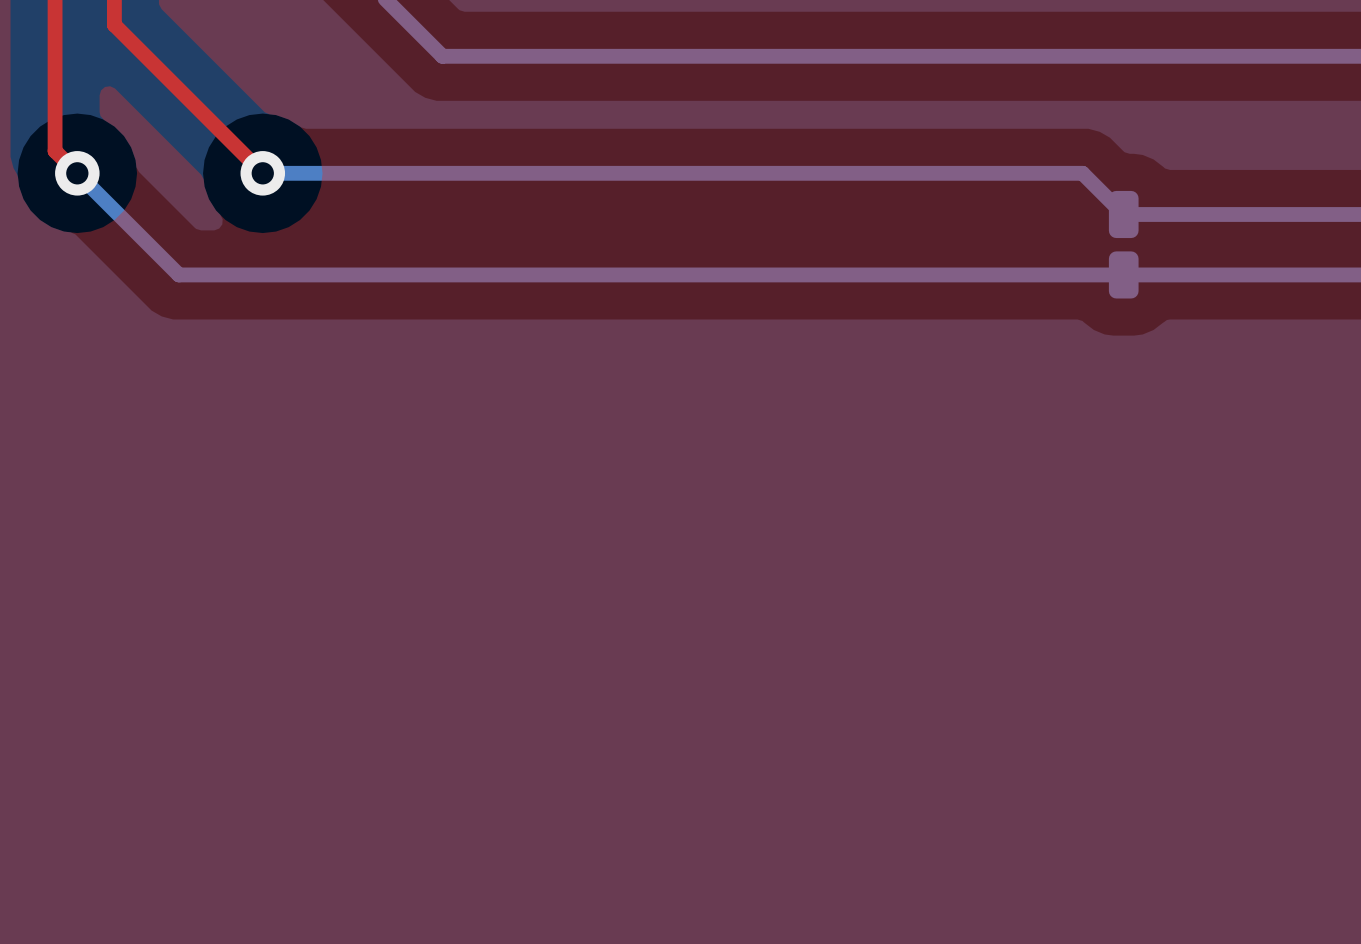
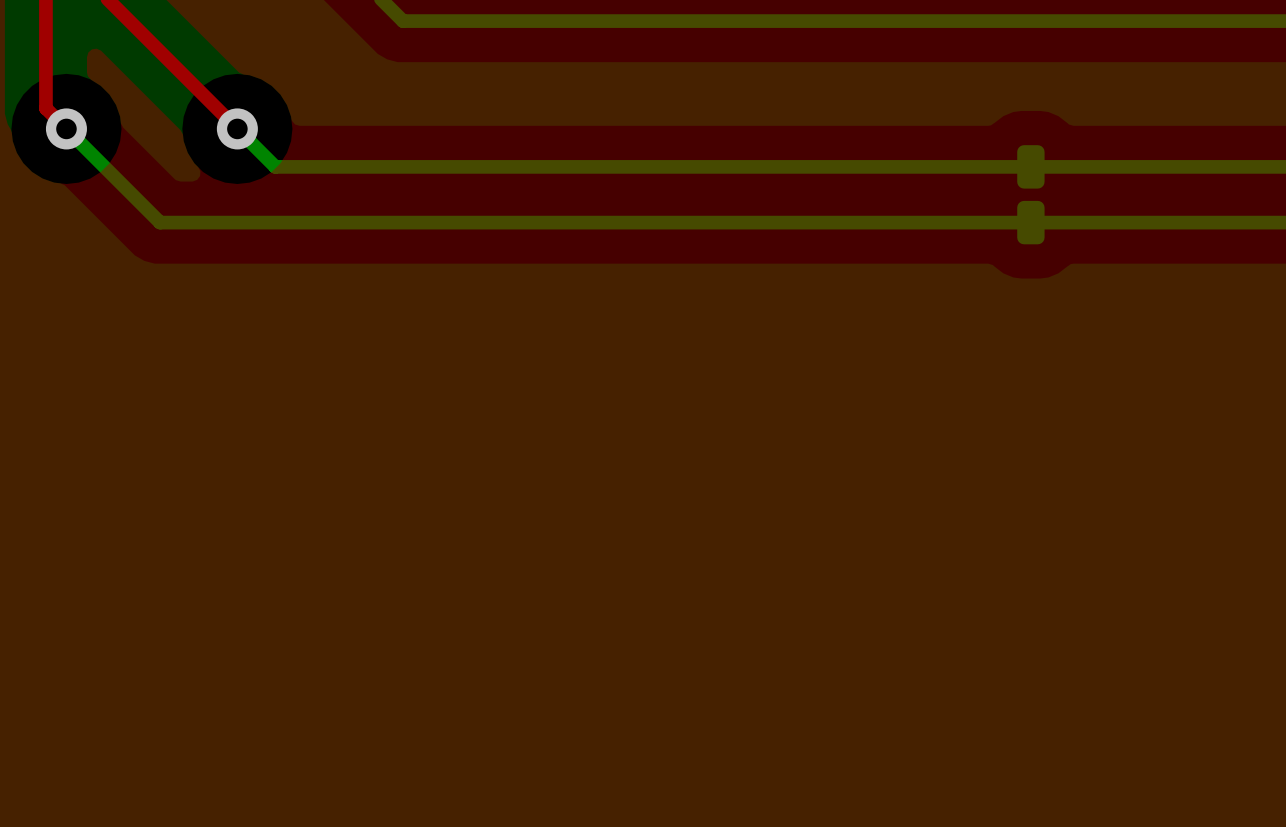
bottom track: (262, 173) (1082, 173) (1123, 214) -> (237, 128) (275, 166) (1030, 166)

